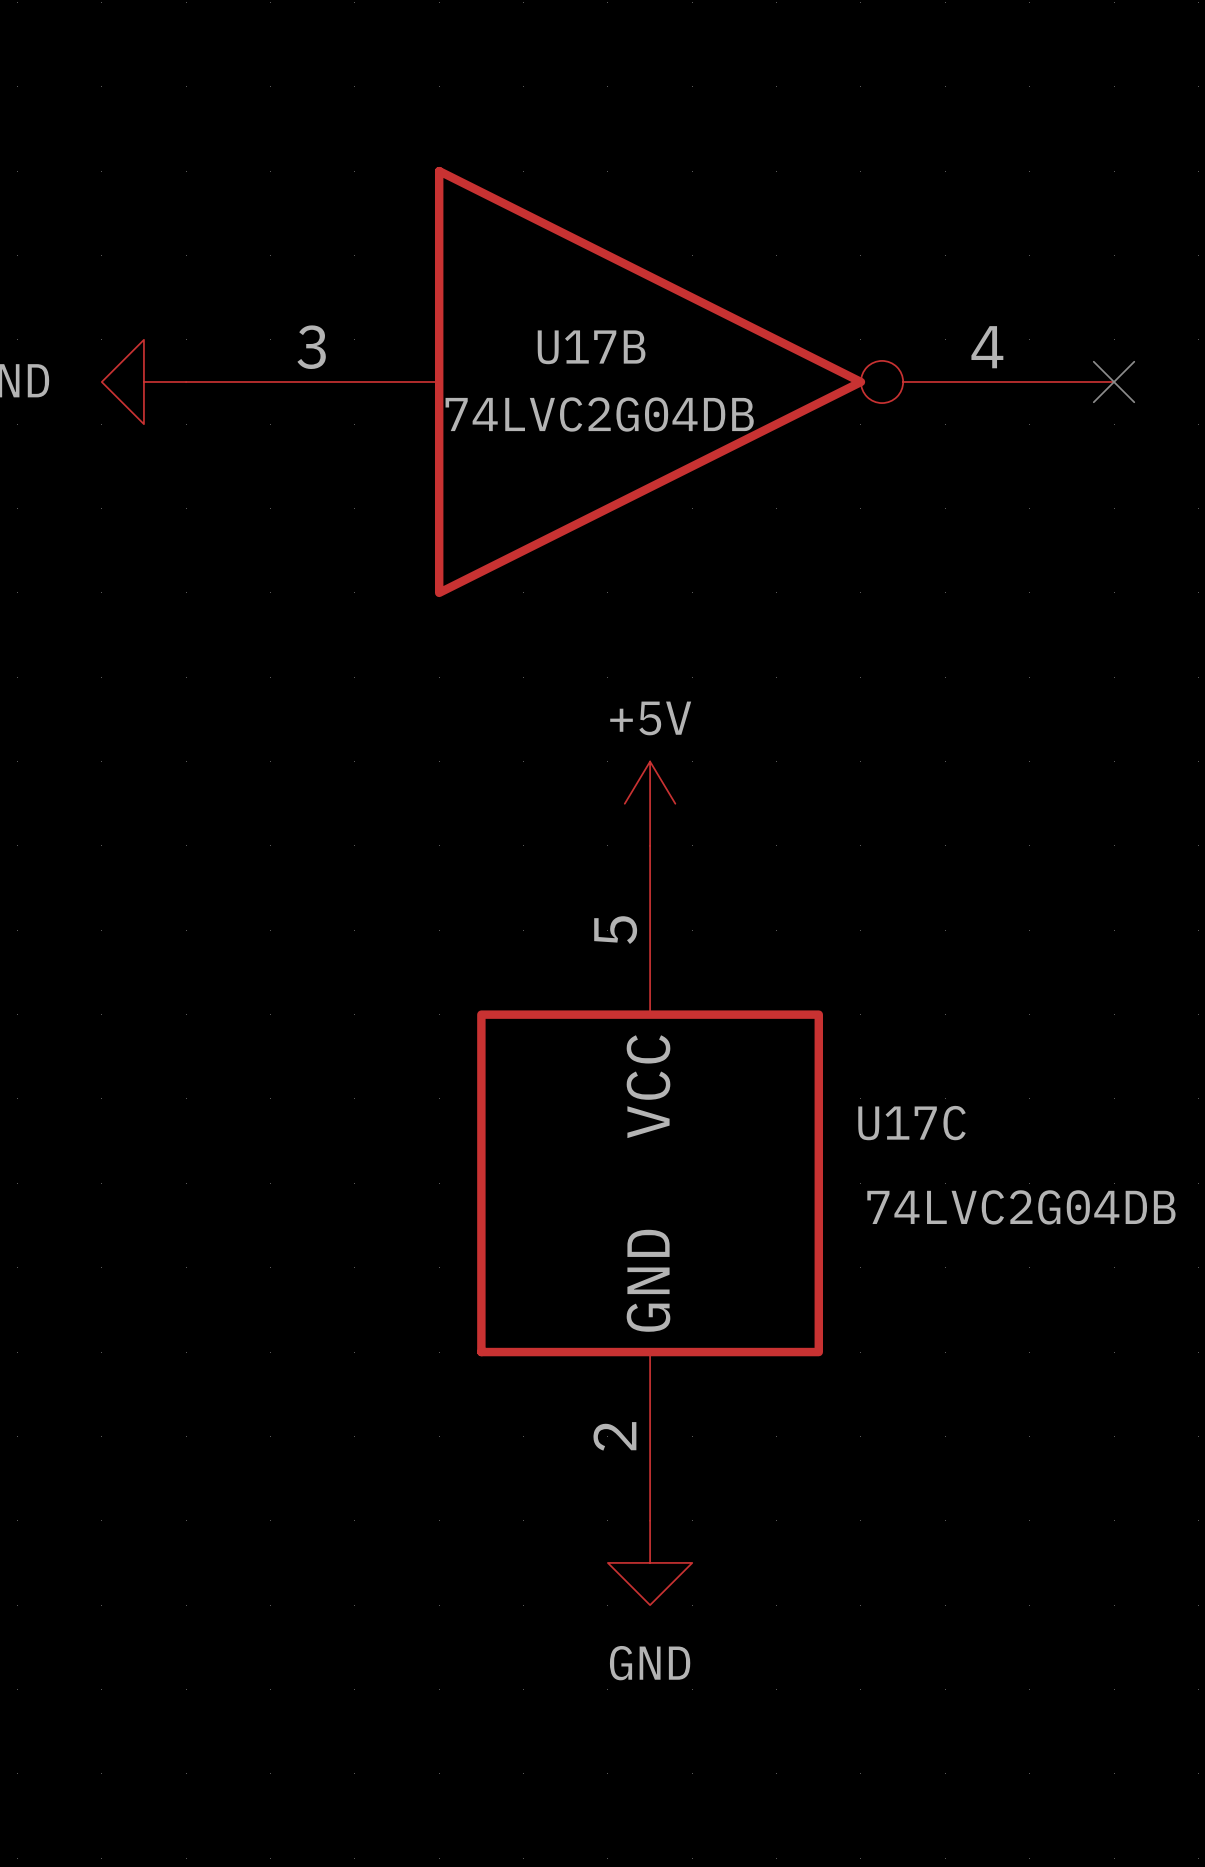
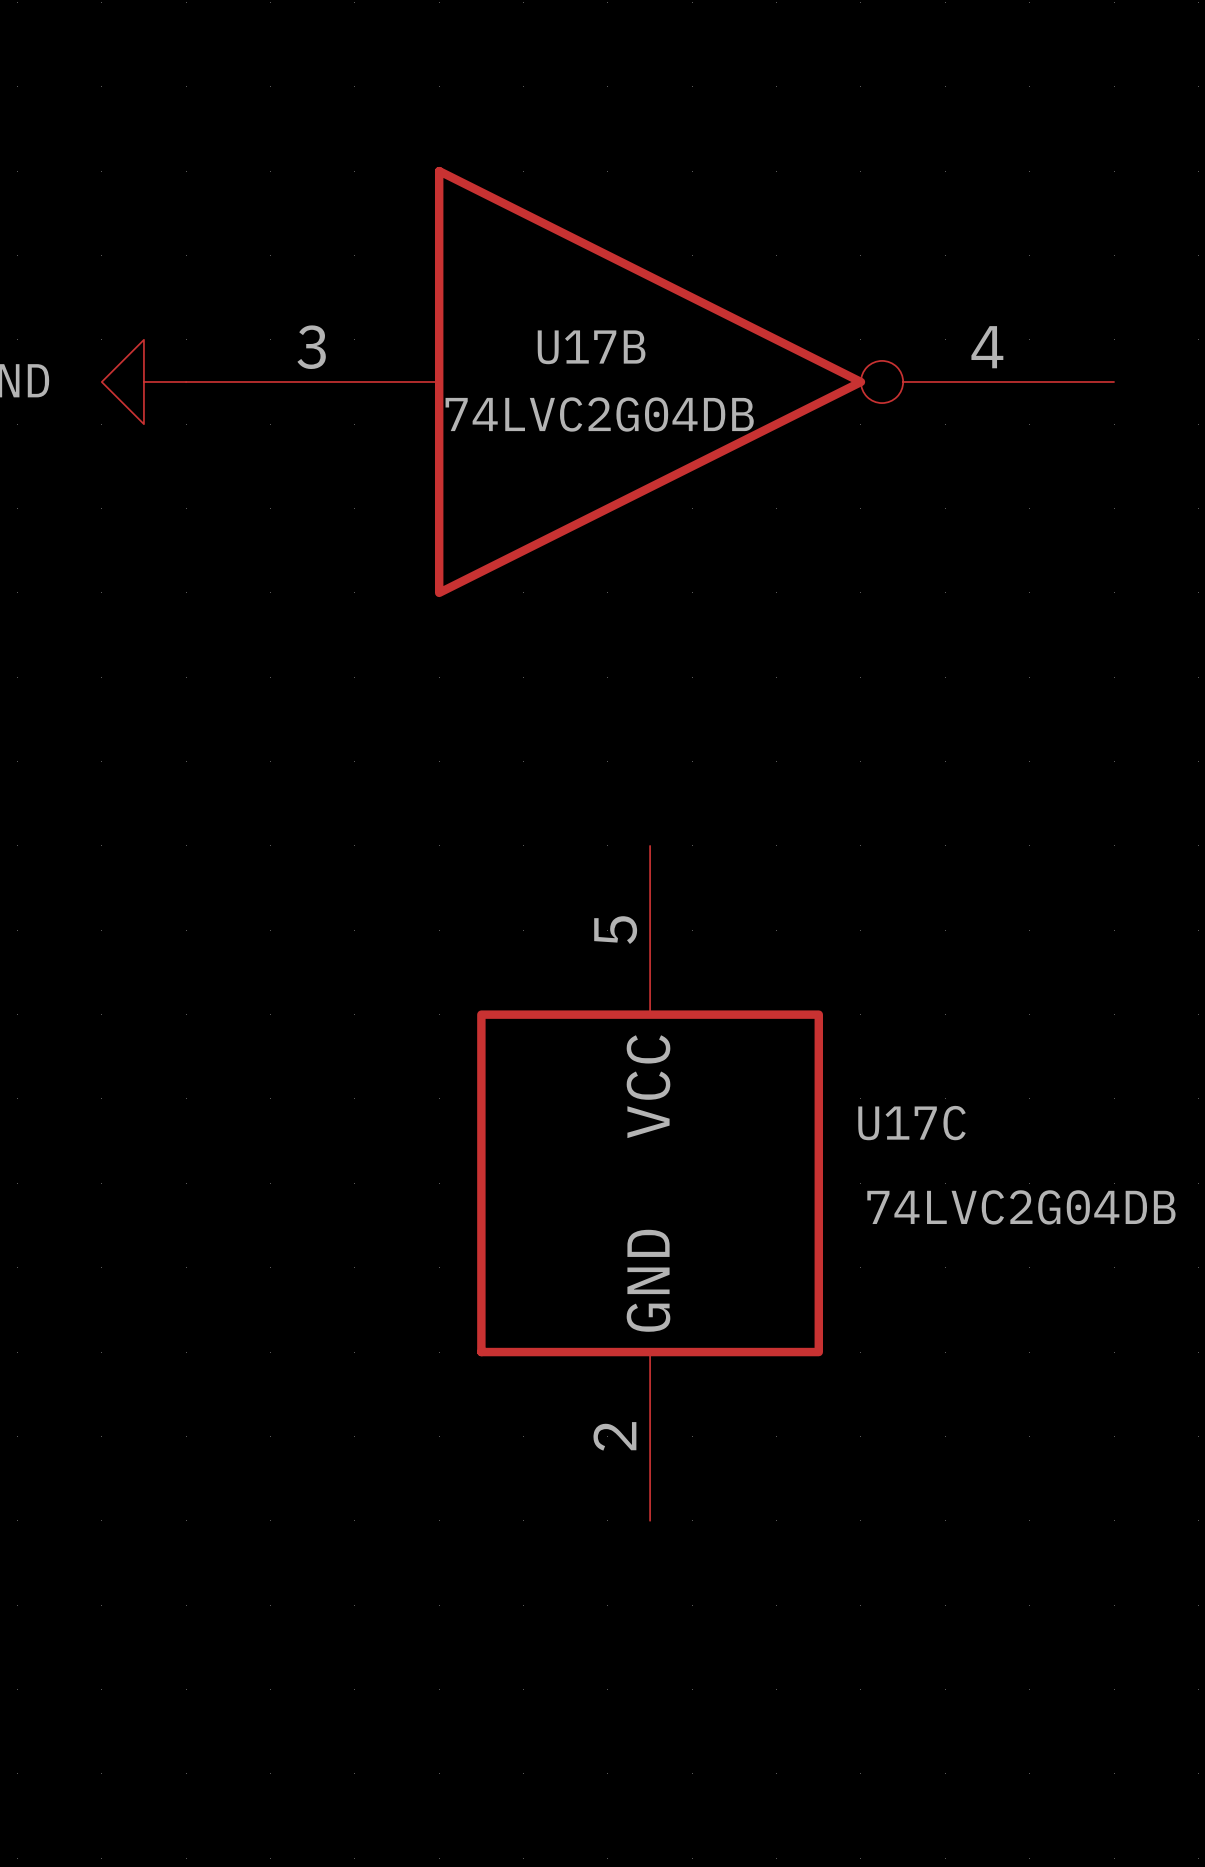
no-connect mark: (1114, 381) -> none
power symbol: +5V (650, 803) -> none
power symbol: GND (650, 1562) -> none

